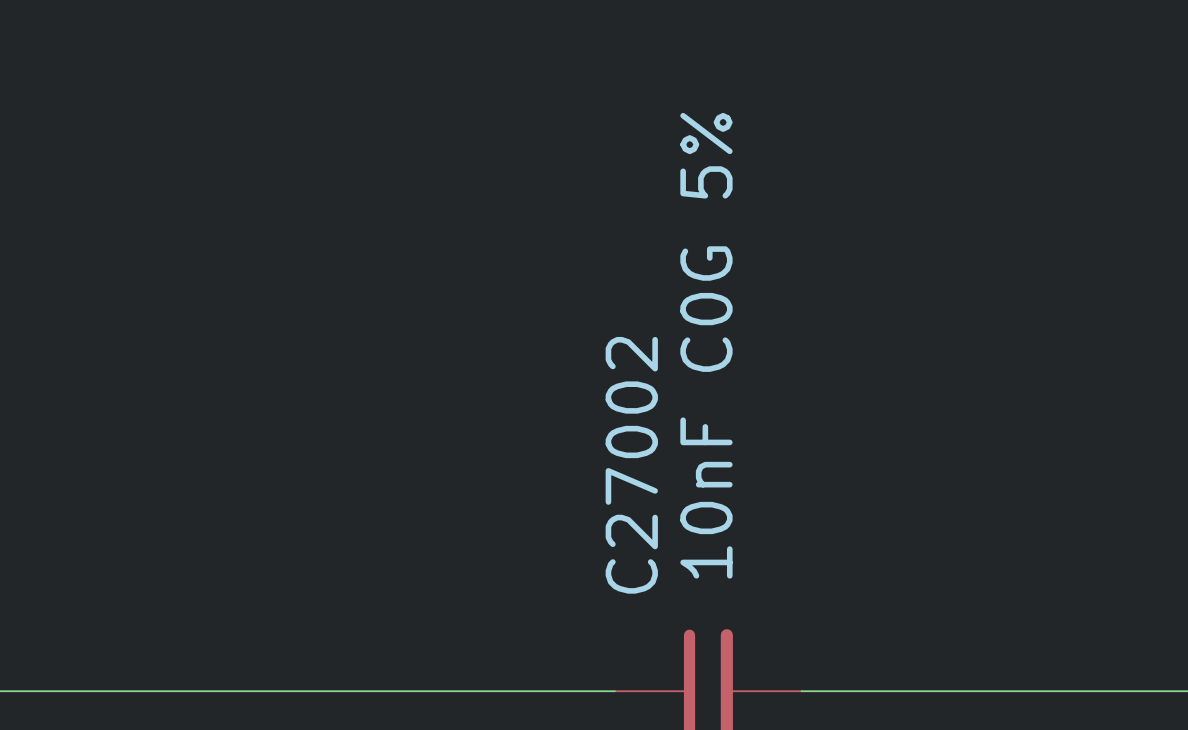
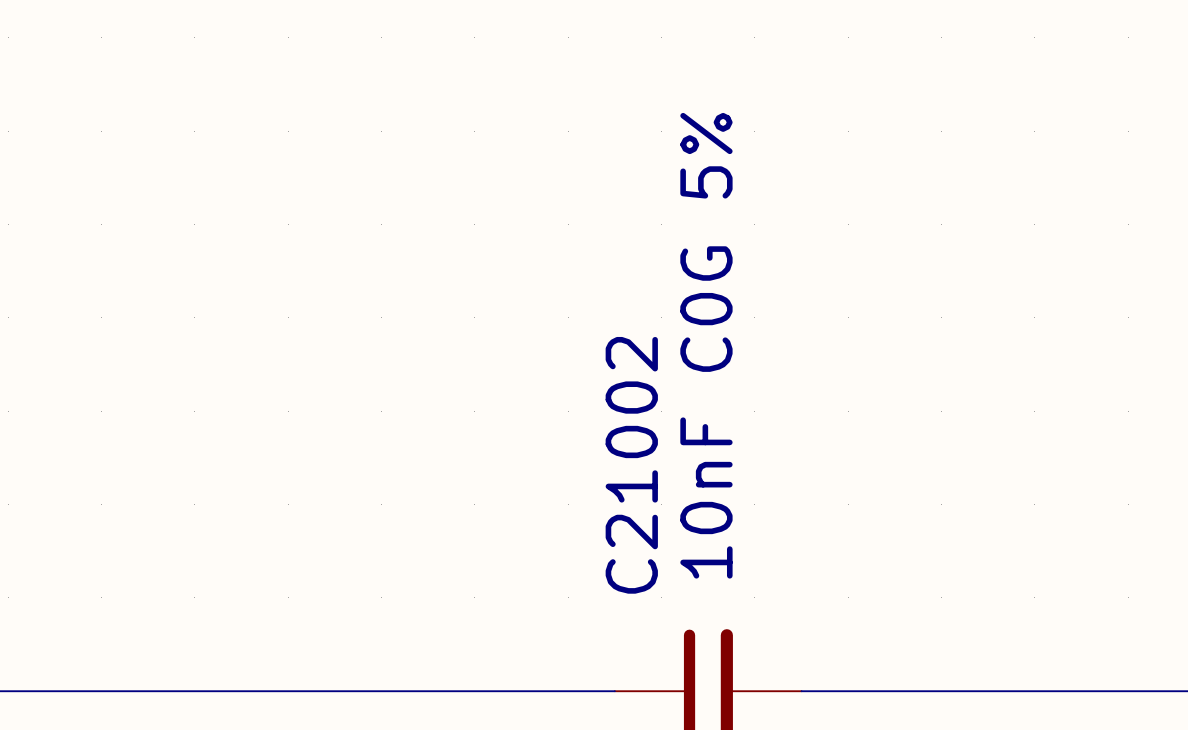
C27002 name: C27002 (631, 465) -> C21002 (631, 465)

